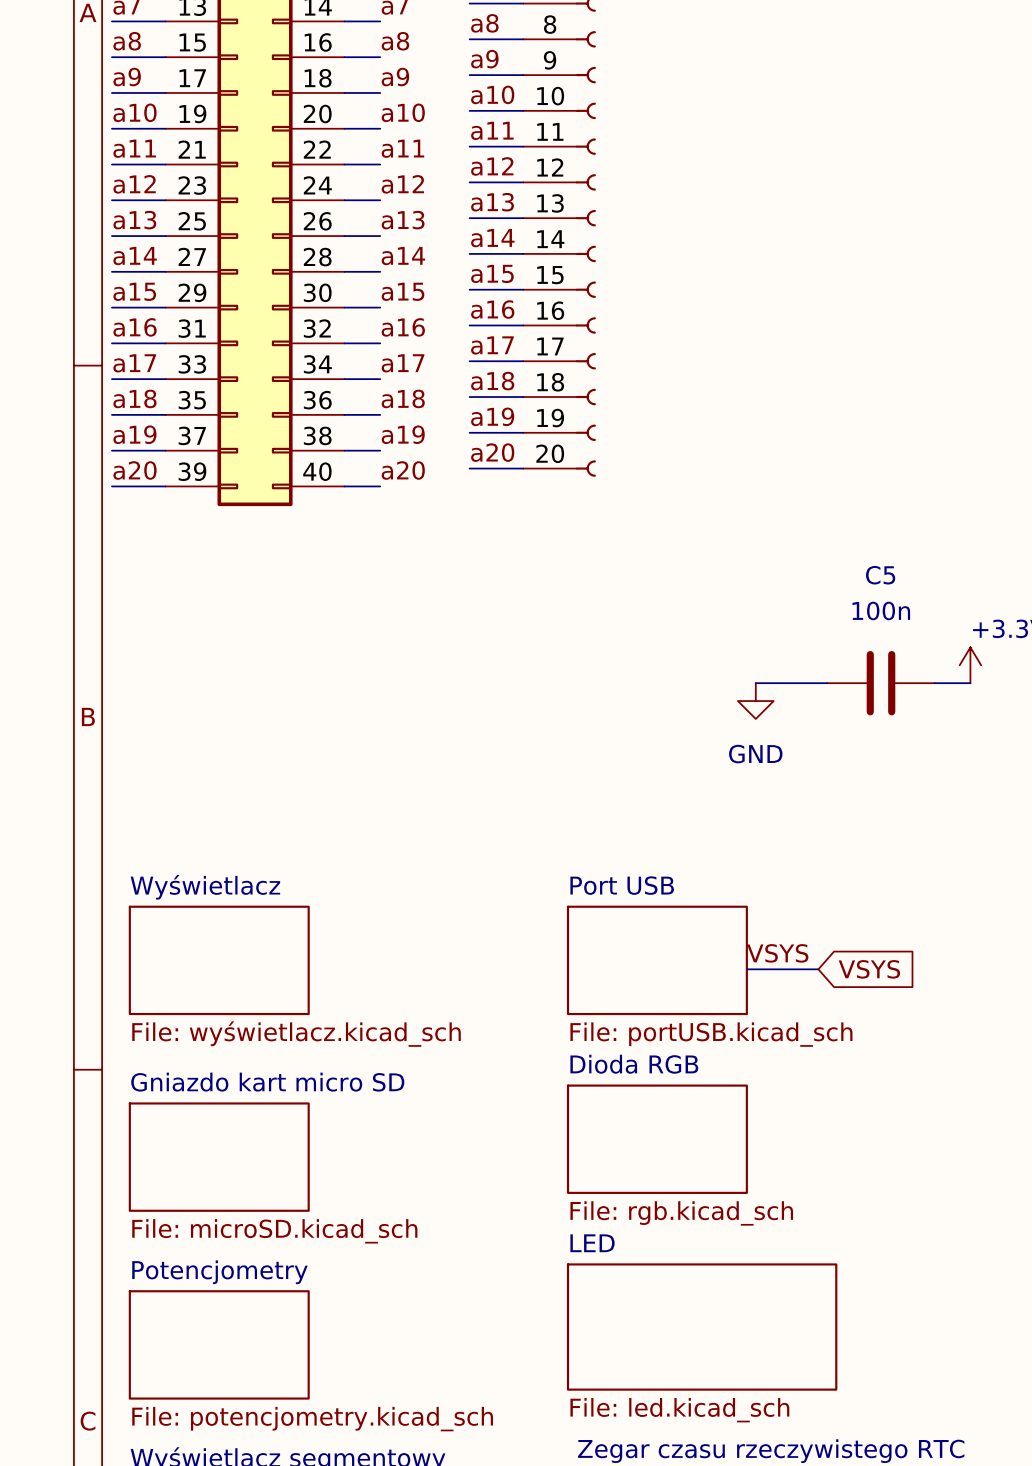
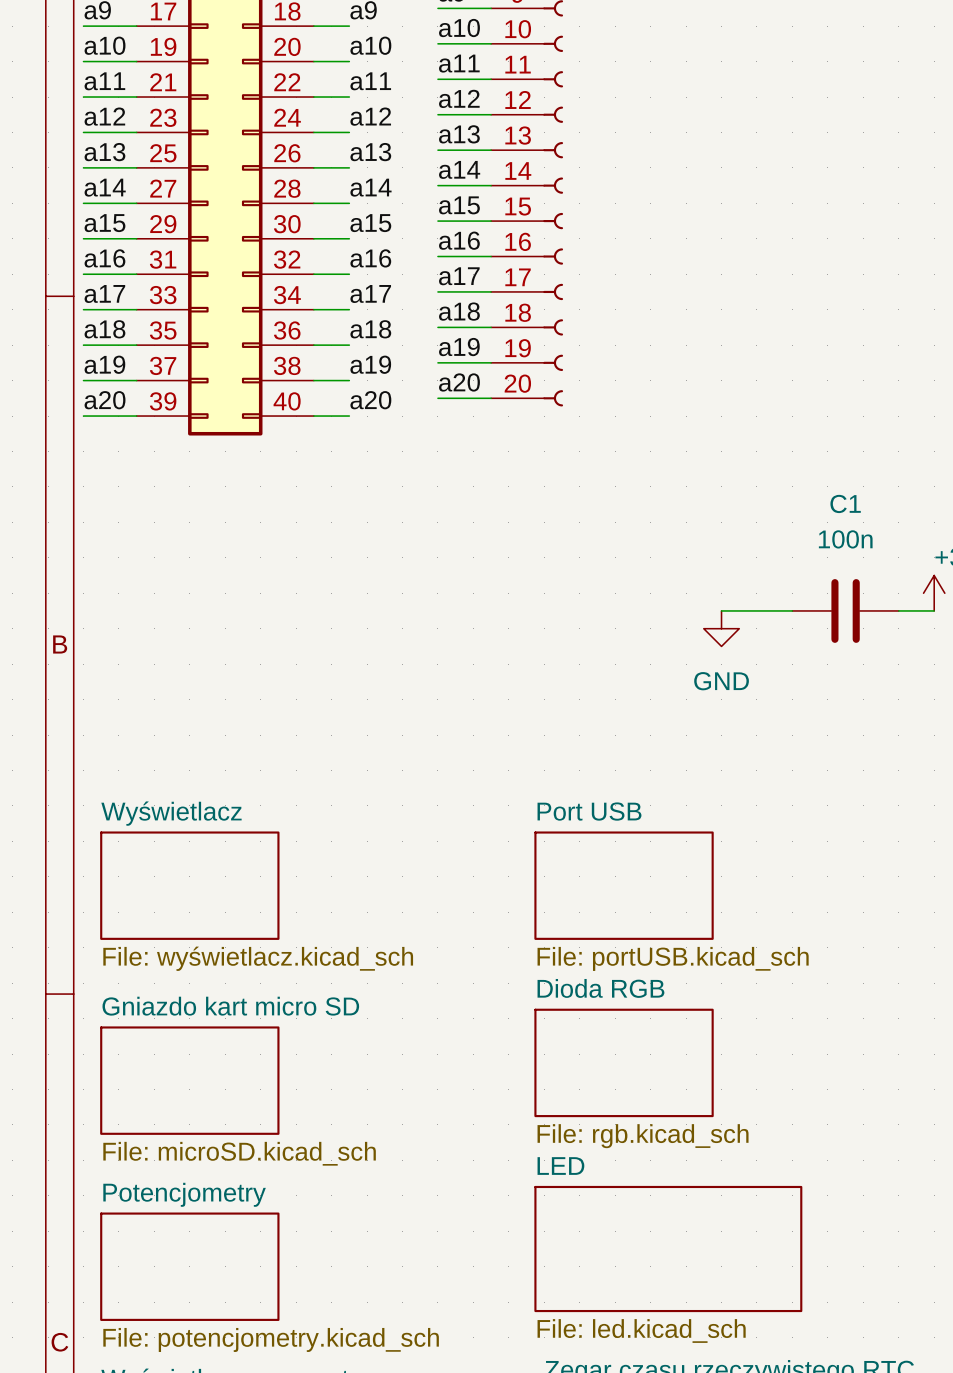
C5 name: C5 (880, 575) -> C1 (845, 503)
label: VSYS (777, 953) -> none
wire: (746, 969) (818, 969) -> none
global label: VSYS (869, 969) -> none

